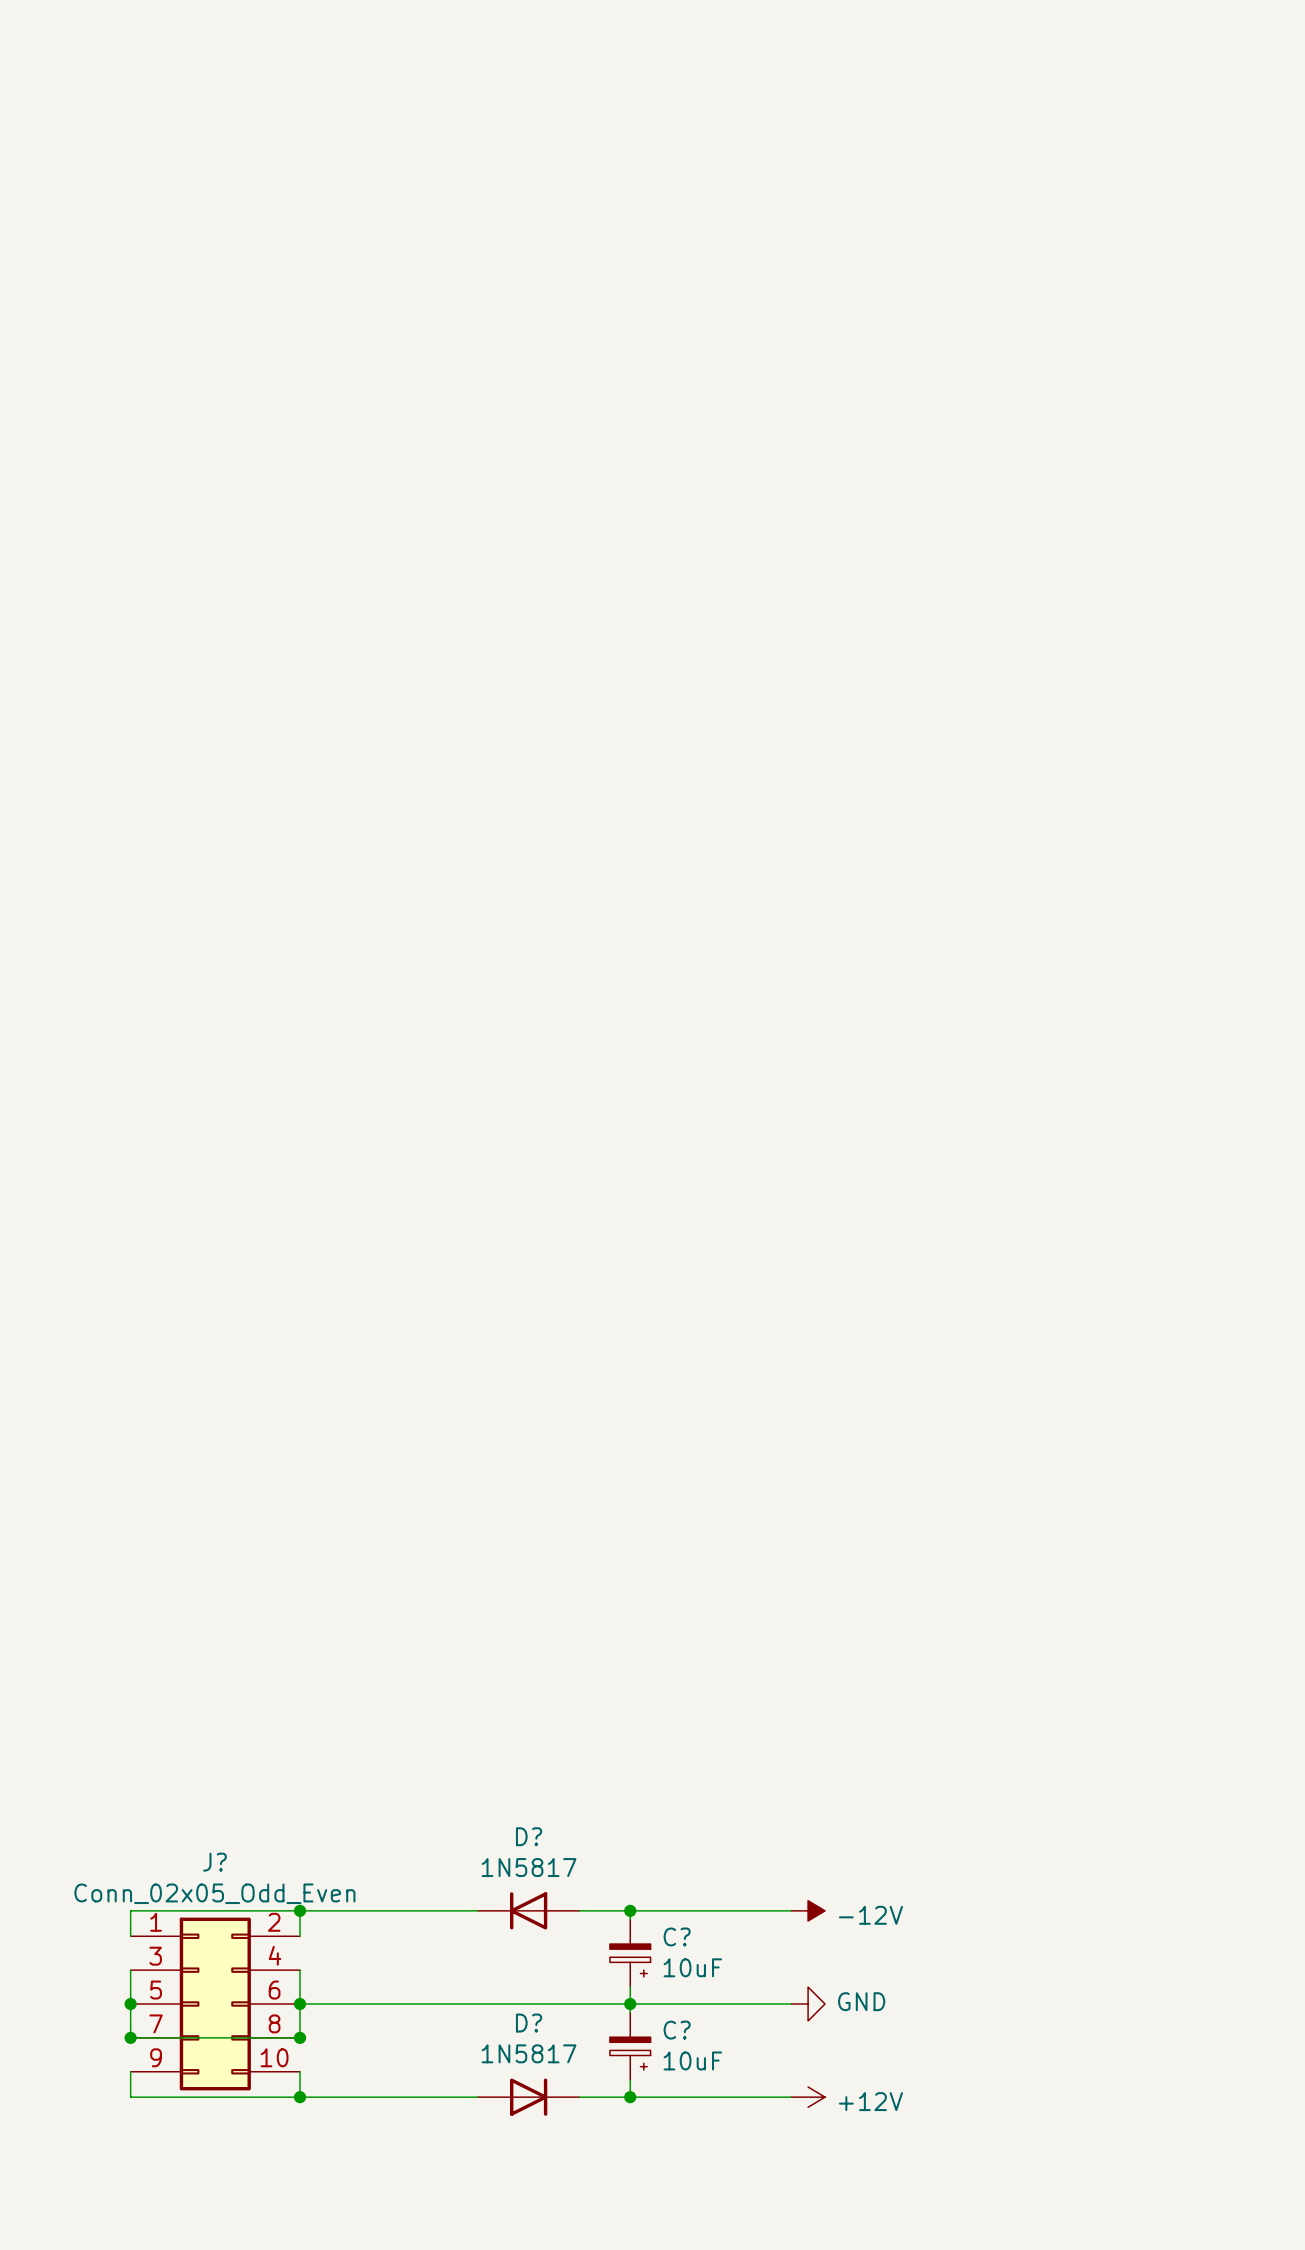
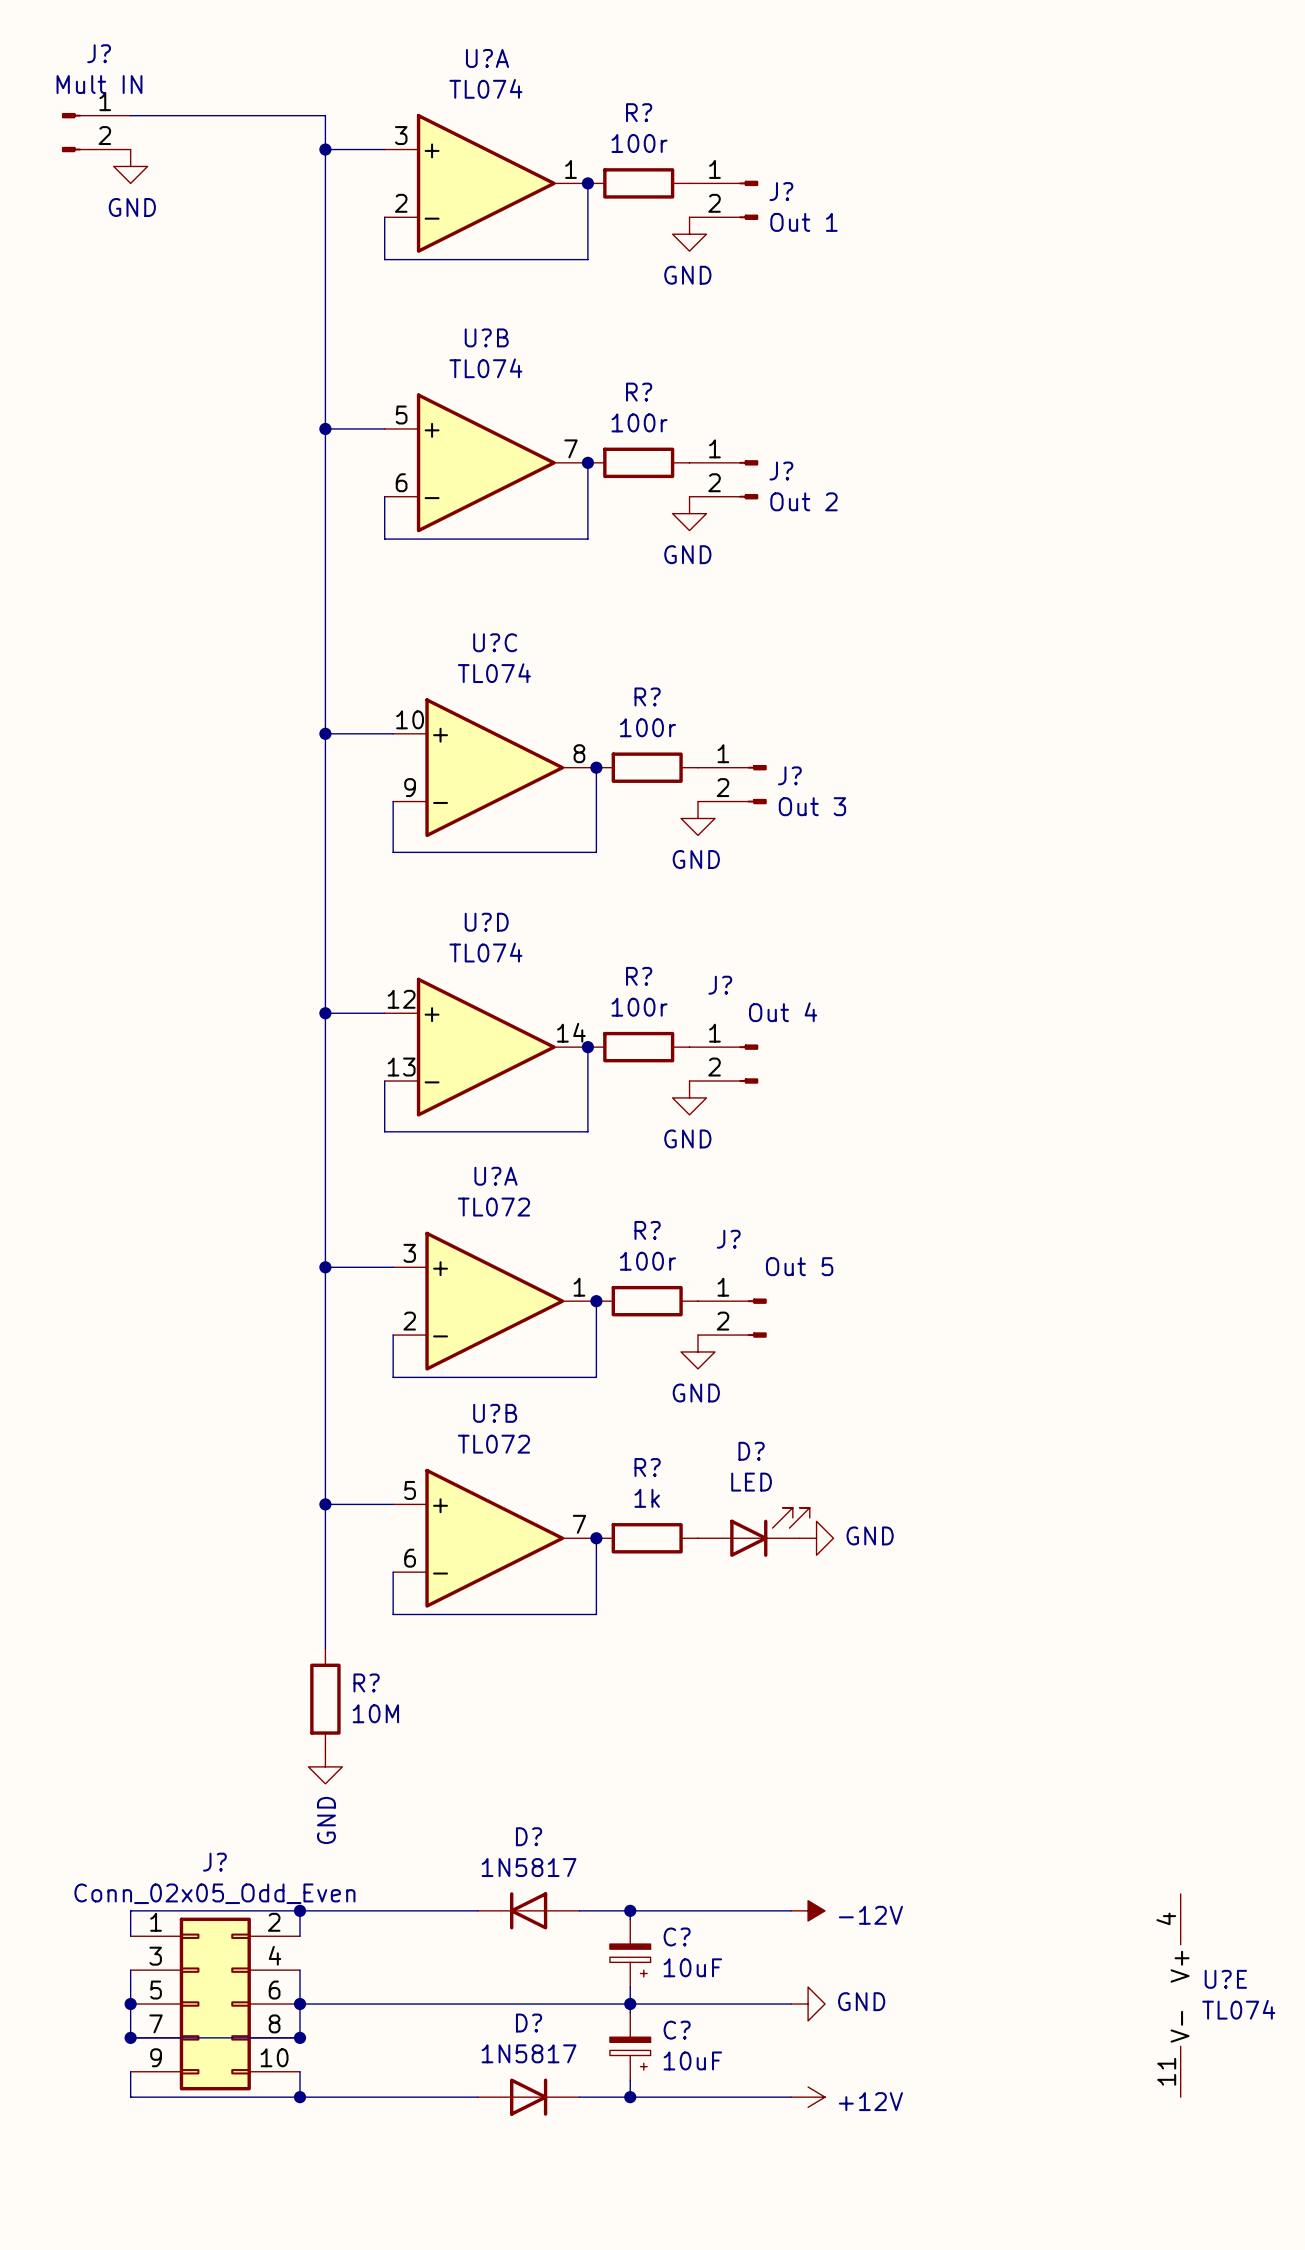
wire: none -> (130, 115) (325, 115) (325, 733)
J?: none -> Mult IN (96, 132)
wire: none -> (325, 149) (384, 149)
junction: none -> (325, 149)
power symbol: none -> GND (130, 166)
U?A: none -> TL074 (486, 183)
wire: none -> (587, 183) (587, 259) (384, 259) (384, 217)
junction: none -> (587, 183)
R?: none -> 100r (638, 183)
J?: none -> Out 1 (723, 200)
power symbol: none -> GND (689, 234)
wire: none -> (325, 428) (384, 428)
junction: none -> (325, 428)
U?B: none -> TL074 (486, 462)
wire: none -> (587, 462) (587, 539) (384, 539) (384, 496)
junction: none -> (587, 462)
R?: none -> 100r (638, 462)
J?: none -> Out 2 (723, 479)
power symbol: none -> GND (689, 513)
wire: none -> (325, 733) (325, 1648)
wire: none -> (325, 733) (393, 733)
junction: none -> (325, 733)
U?C: none -> TL074 (494, 767)
wire: none -> (596, 767) (596, 852) (393, 852) (393, 801)
junction: none -> (596, 767)
R?: none -> 100r (647, 767)
J?: none -> Out 3 (732, 784)
power symbol: none -> GND (698, 818)
wire: none -> (325, 1013) (384, 1013)
junction: none -> (325, 1013)
U?D: none -> TL074 (486, 1047)
wire: none -> (587, 1047) (587, 1131) (384, 1131) (384, 1081)
junction: none -> (587, 1047)
R?: none -> 100r (638, 1047)
J?: none -> Out 4 (723, 1064)
power symbol: none -> GND (689, 1097)
wire: none -> (325, 1267) (393, 1267)
junction: none -> (325, 1267)
U?A: none -> TL072 (494, 1301)
wire: none -> (596, 1301) (596, 1377) (393, 1377) (393, 1335)
junction: none -> (596, 1301)
R?: none -> 100r (647, 1301)
J?: none -> Out 5 (732, 1318)
power symbol: none -> GND (698, 1351)
wire: none -> (325, 1504) (393, 1504)
junction: none -> (325, 1504)
D?: none -> LED (753, 1532)
U?B: none -> TL072 (494, 1538)
wire: none -> (596, 1538) (596, 1614) (393, 1614) (393, 1572)
junction: none -> (596, 1538)
R?: none -> 1k (647, 1538)
power symbol: none -> GND (816, 1538)
R?: none -> 10M (325, 1699)
power symbol: none -> GND (325, 1766)
U?E: none -> TL074 (1180, 1995)

